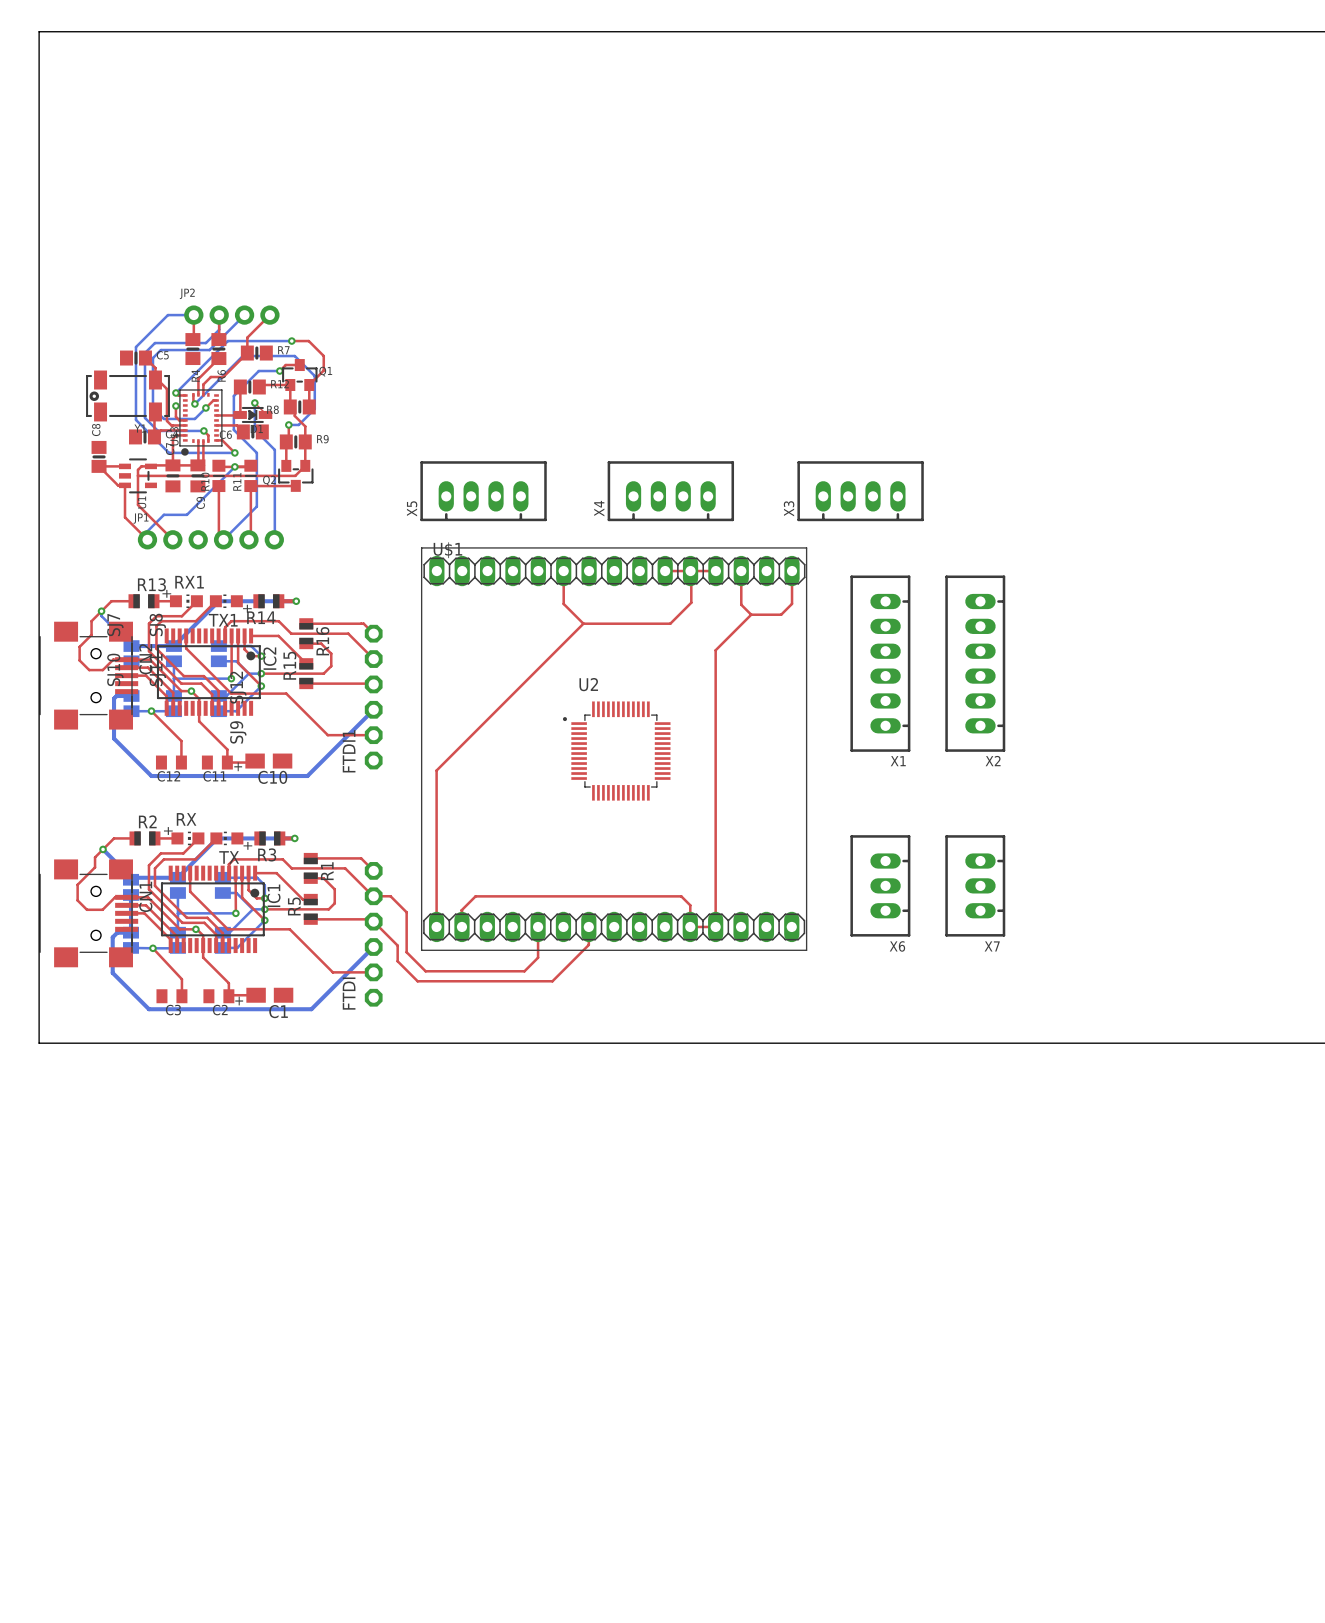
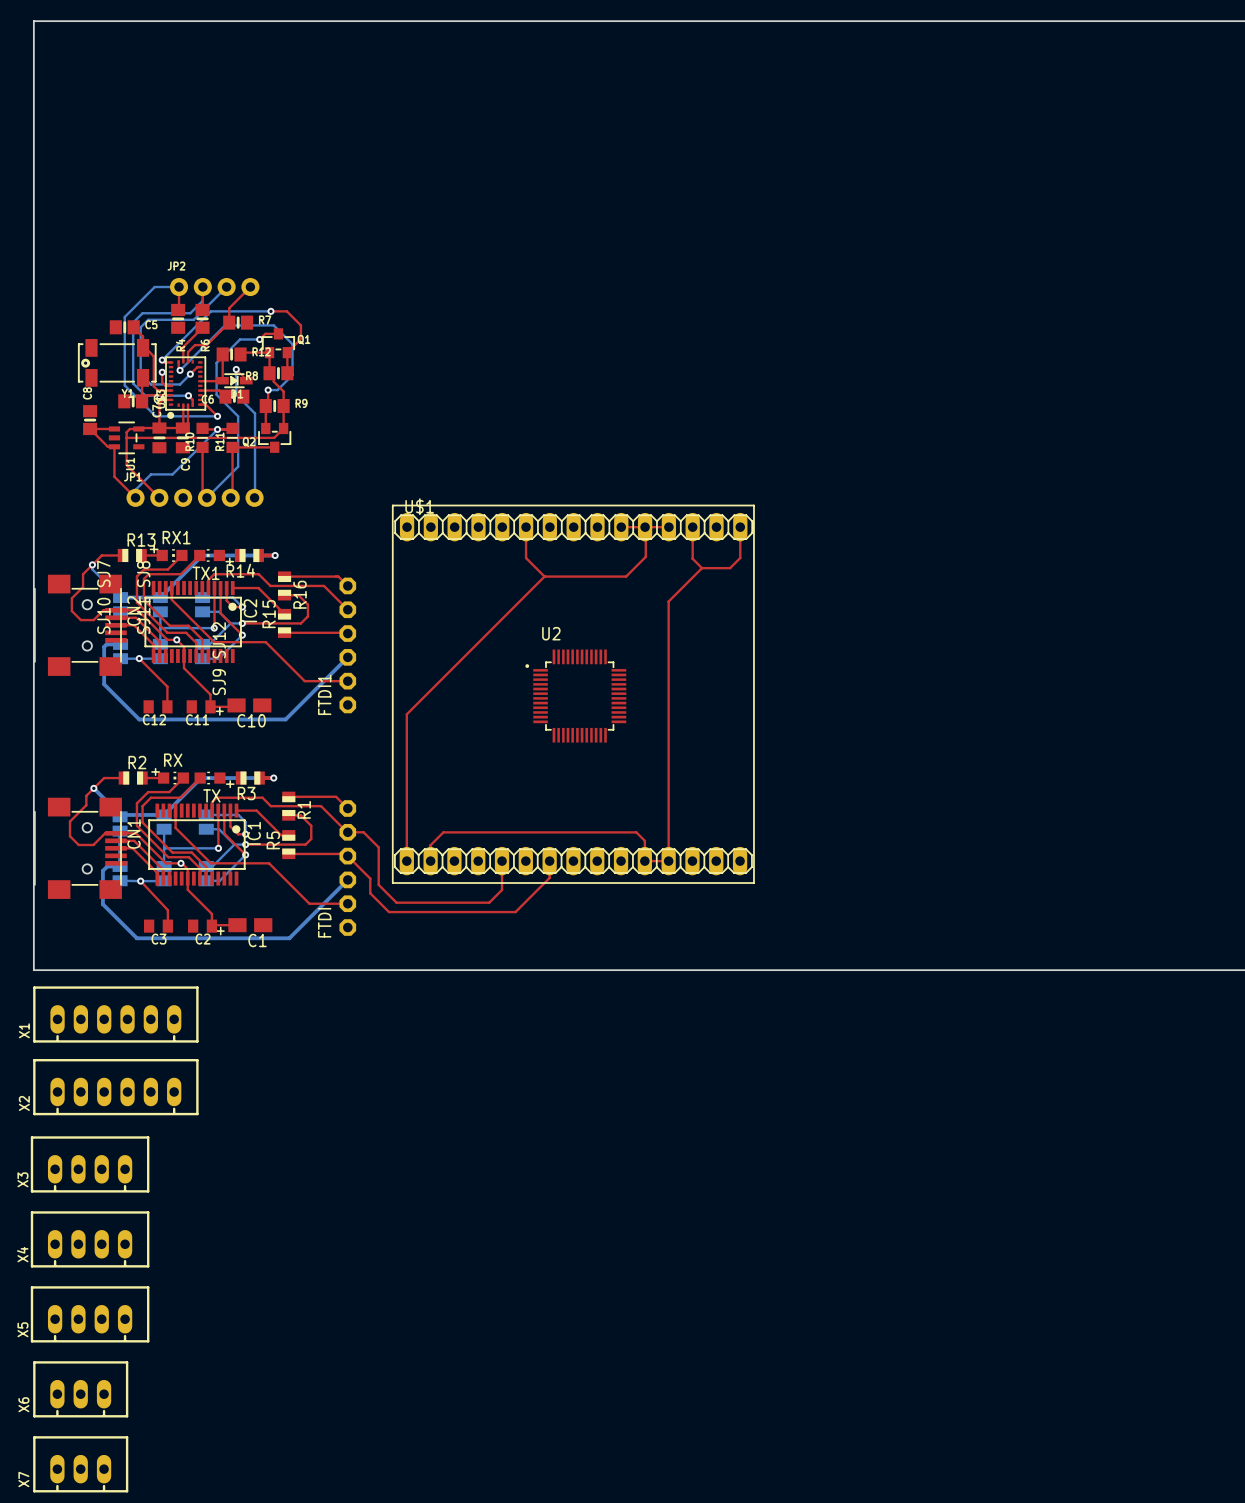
X5 position: (483, 491) -> (90, 1314)
X4 position: (670, 491) -> (90, 1239)
X3 position: (860, 491) -> (90, 1164)
X1 rotation: 0° (880, 663) -> 90° clockwise (115, 1014)
X1 position: (880, 663) -> (115, 1014)
X2 rotation: 0° (975, 663) -> 90° clockwise (115, 1087)
X2 position: (975, 663) -> (115, 1087)
X6 rotation: 0° (880, 885) -> 90° clockwise (80, 1389)
X6 position: (880, 885) -> (80, 1389)
X7 rotation: 0° (975, 885) -> 90° clockwise (80, 1464)
X7 position: (975, 885) -> (80, 1464)

